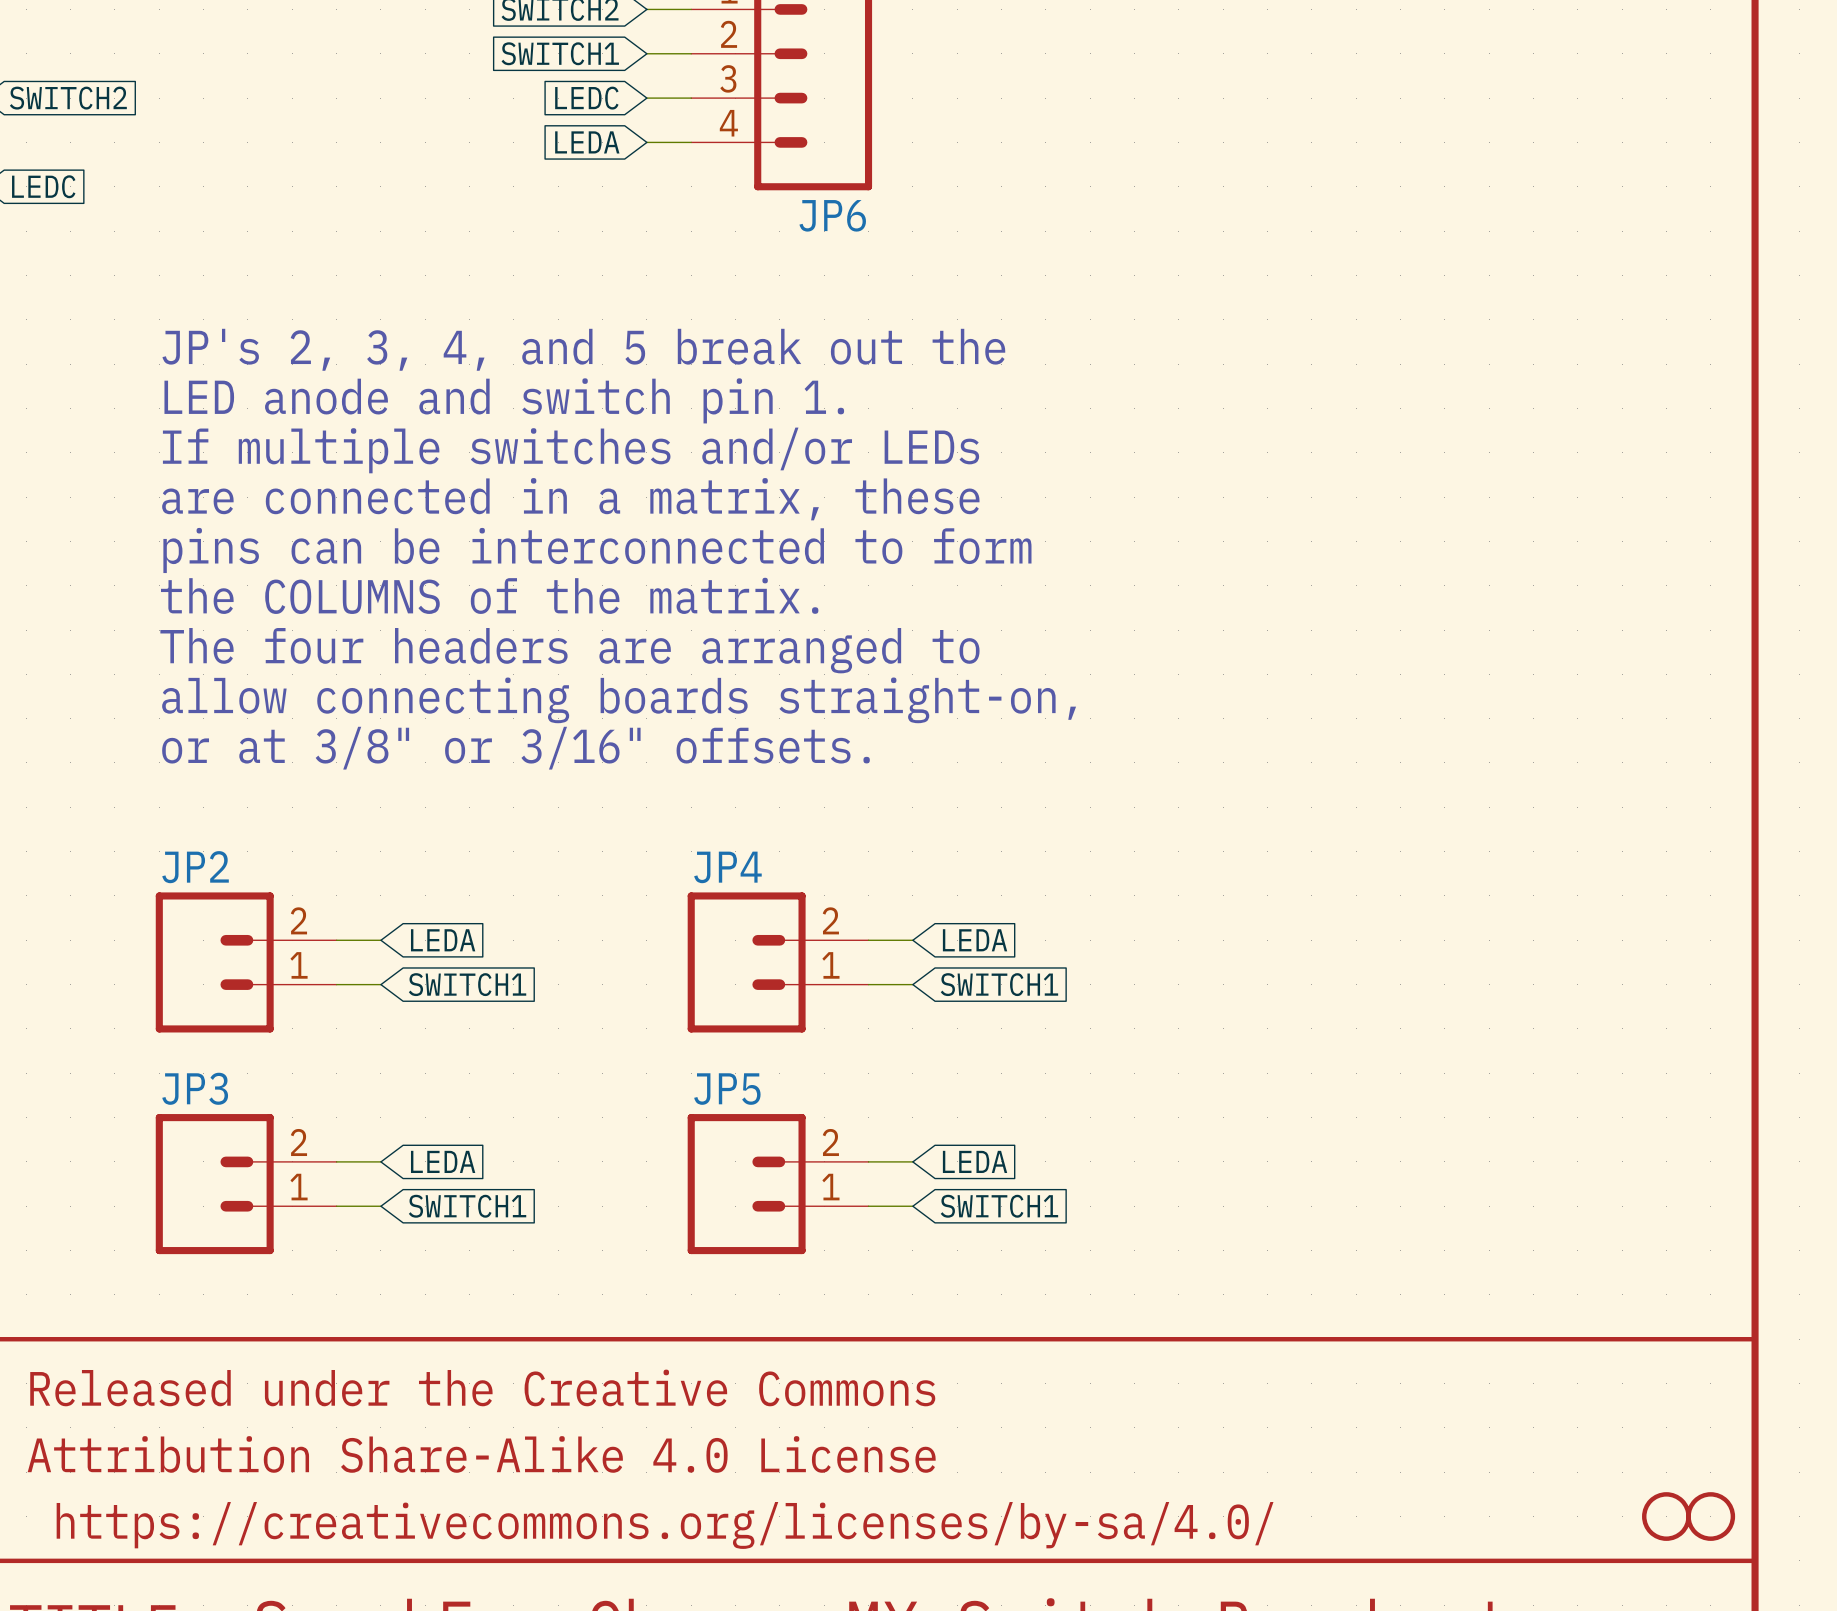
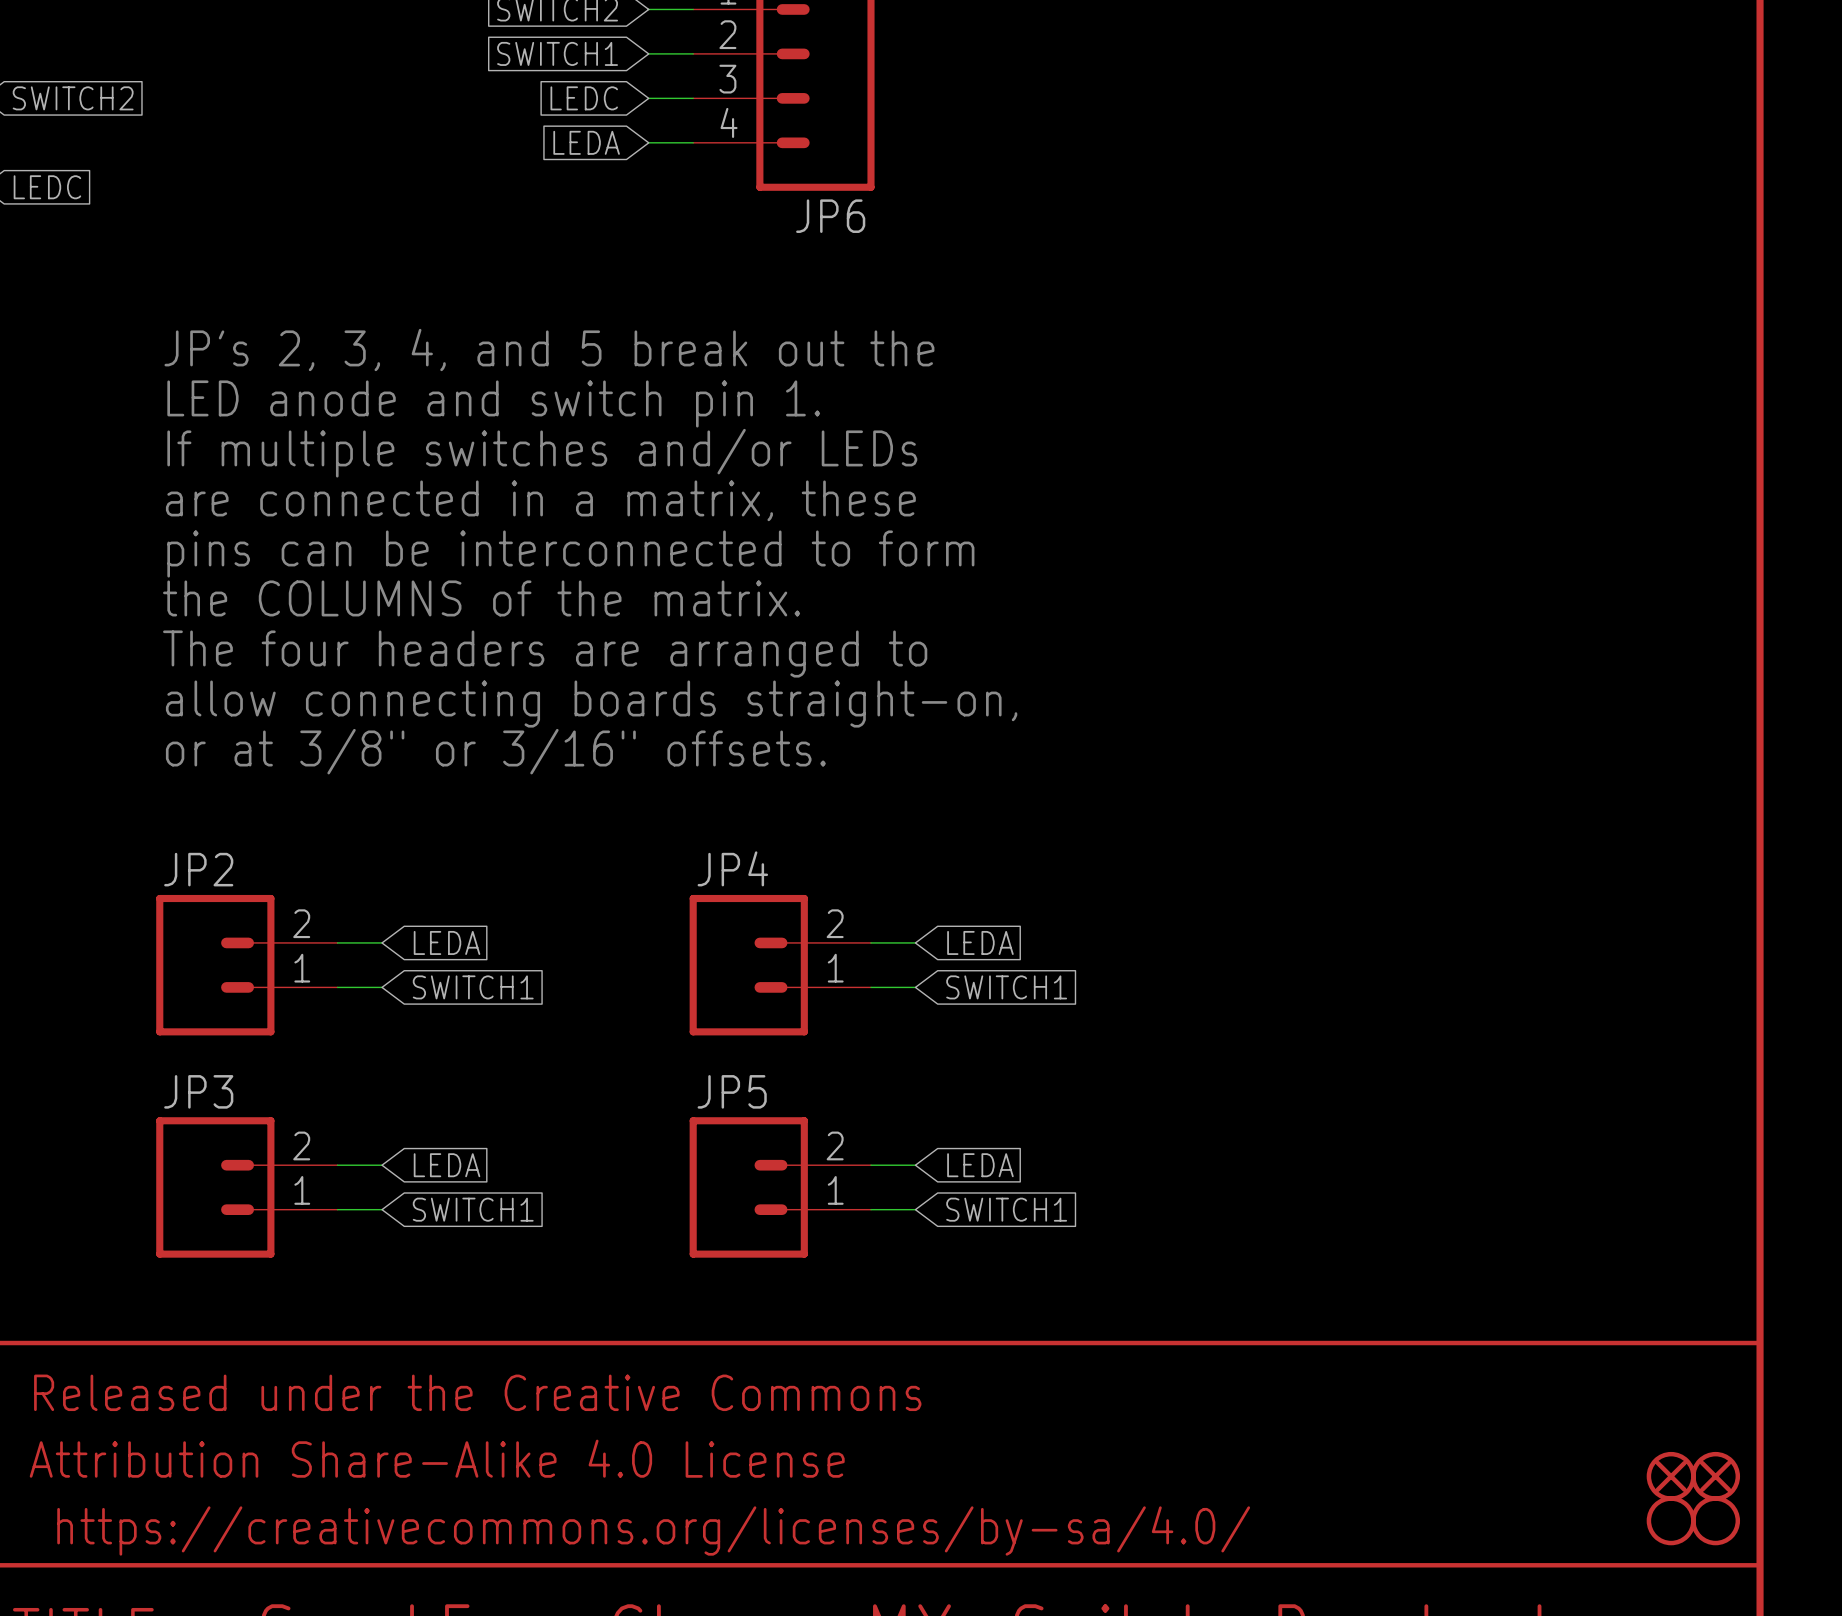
part: none -> (1671, 1476)
part: none -> (1715, 1476)

